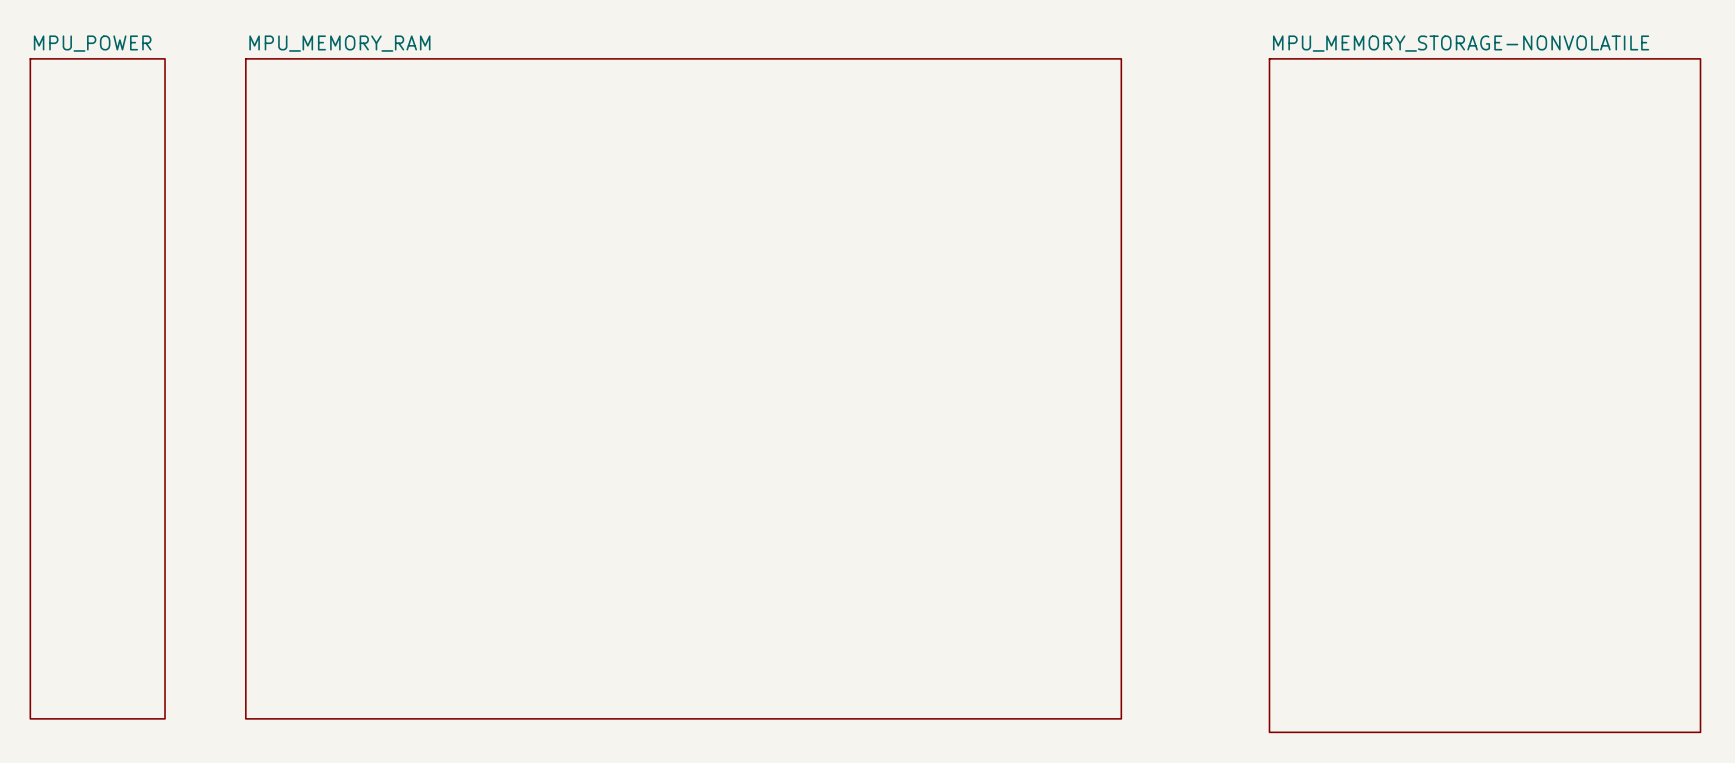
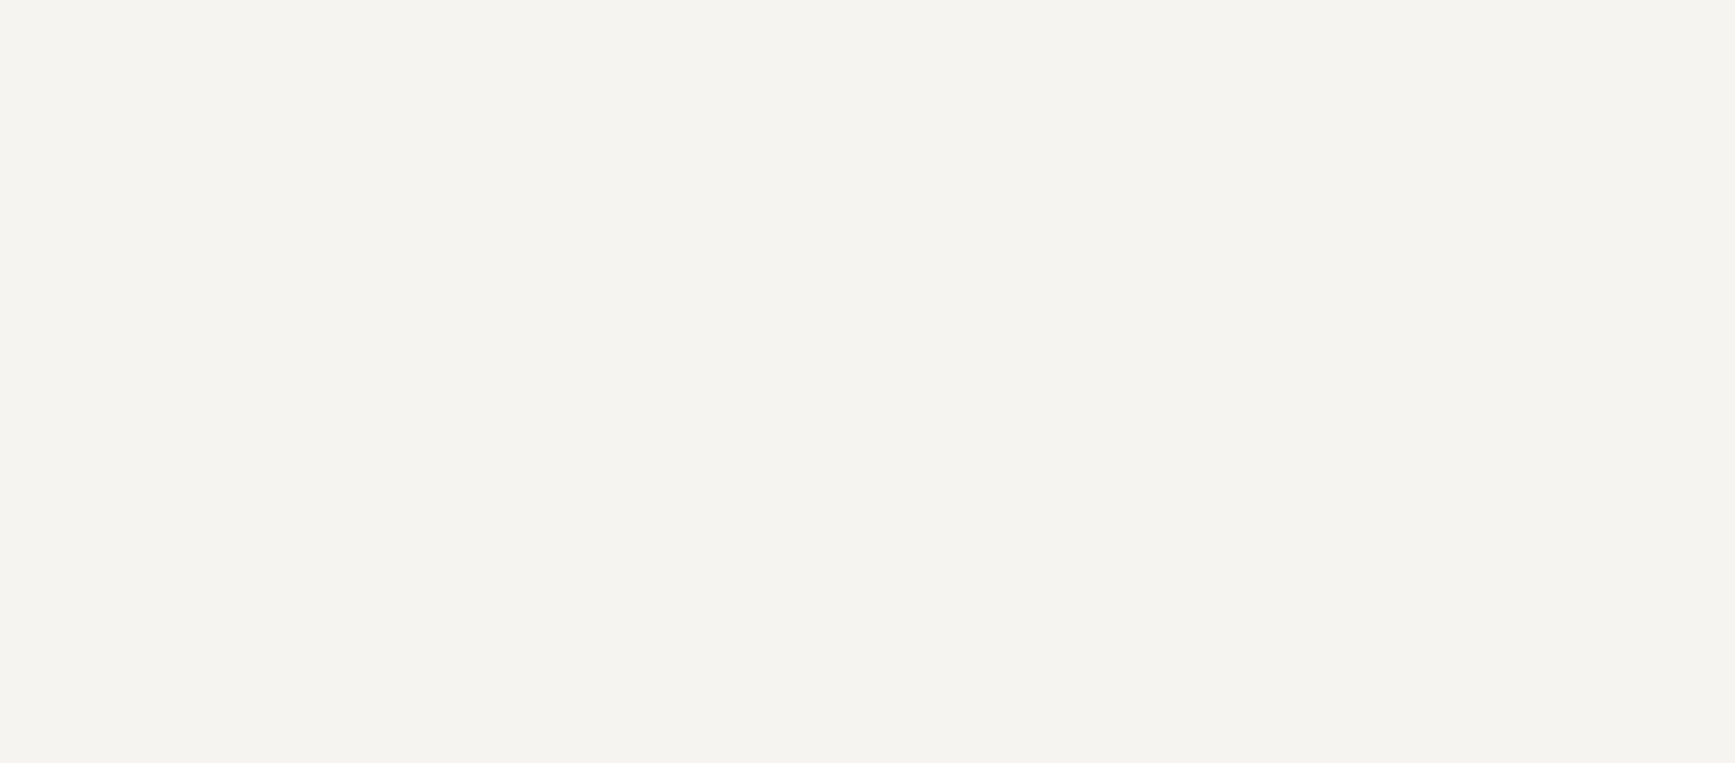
sheet MPU_POWER: (97, 388) -> none
sheet MPU_MEMORY_RAM: (683, 388) -> none
sheet MPU_MEMORY_STORAGE-NONVOLATILE: (1484, 395) -> none

